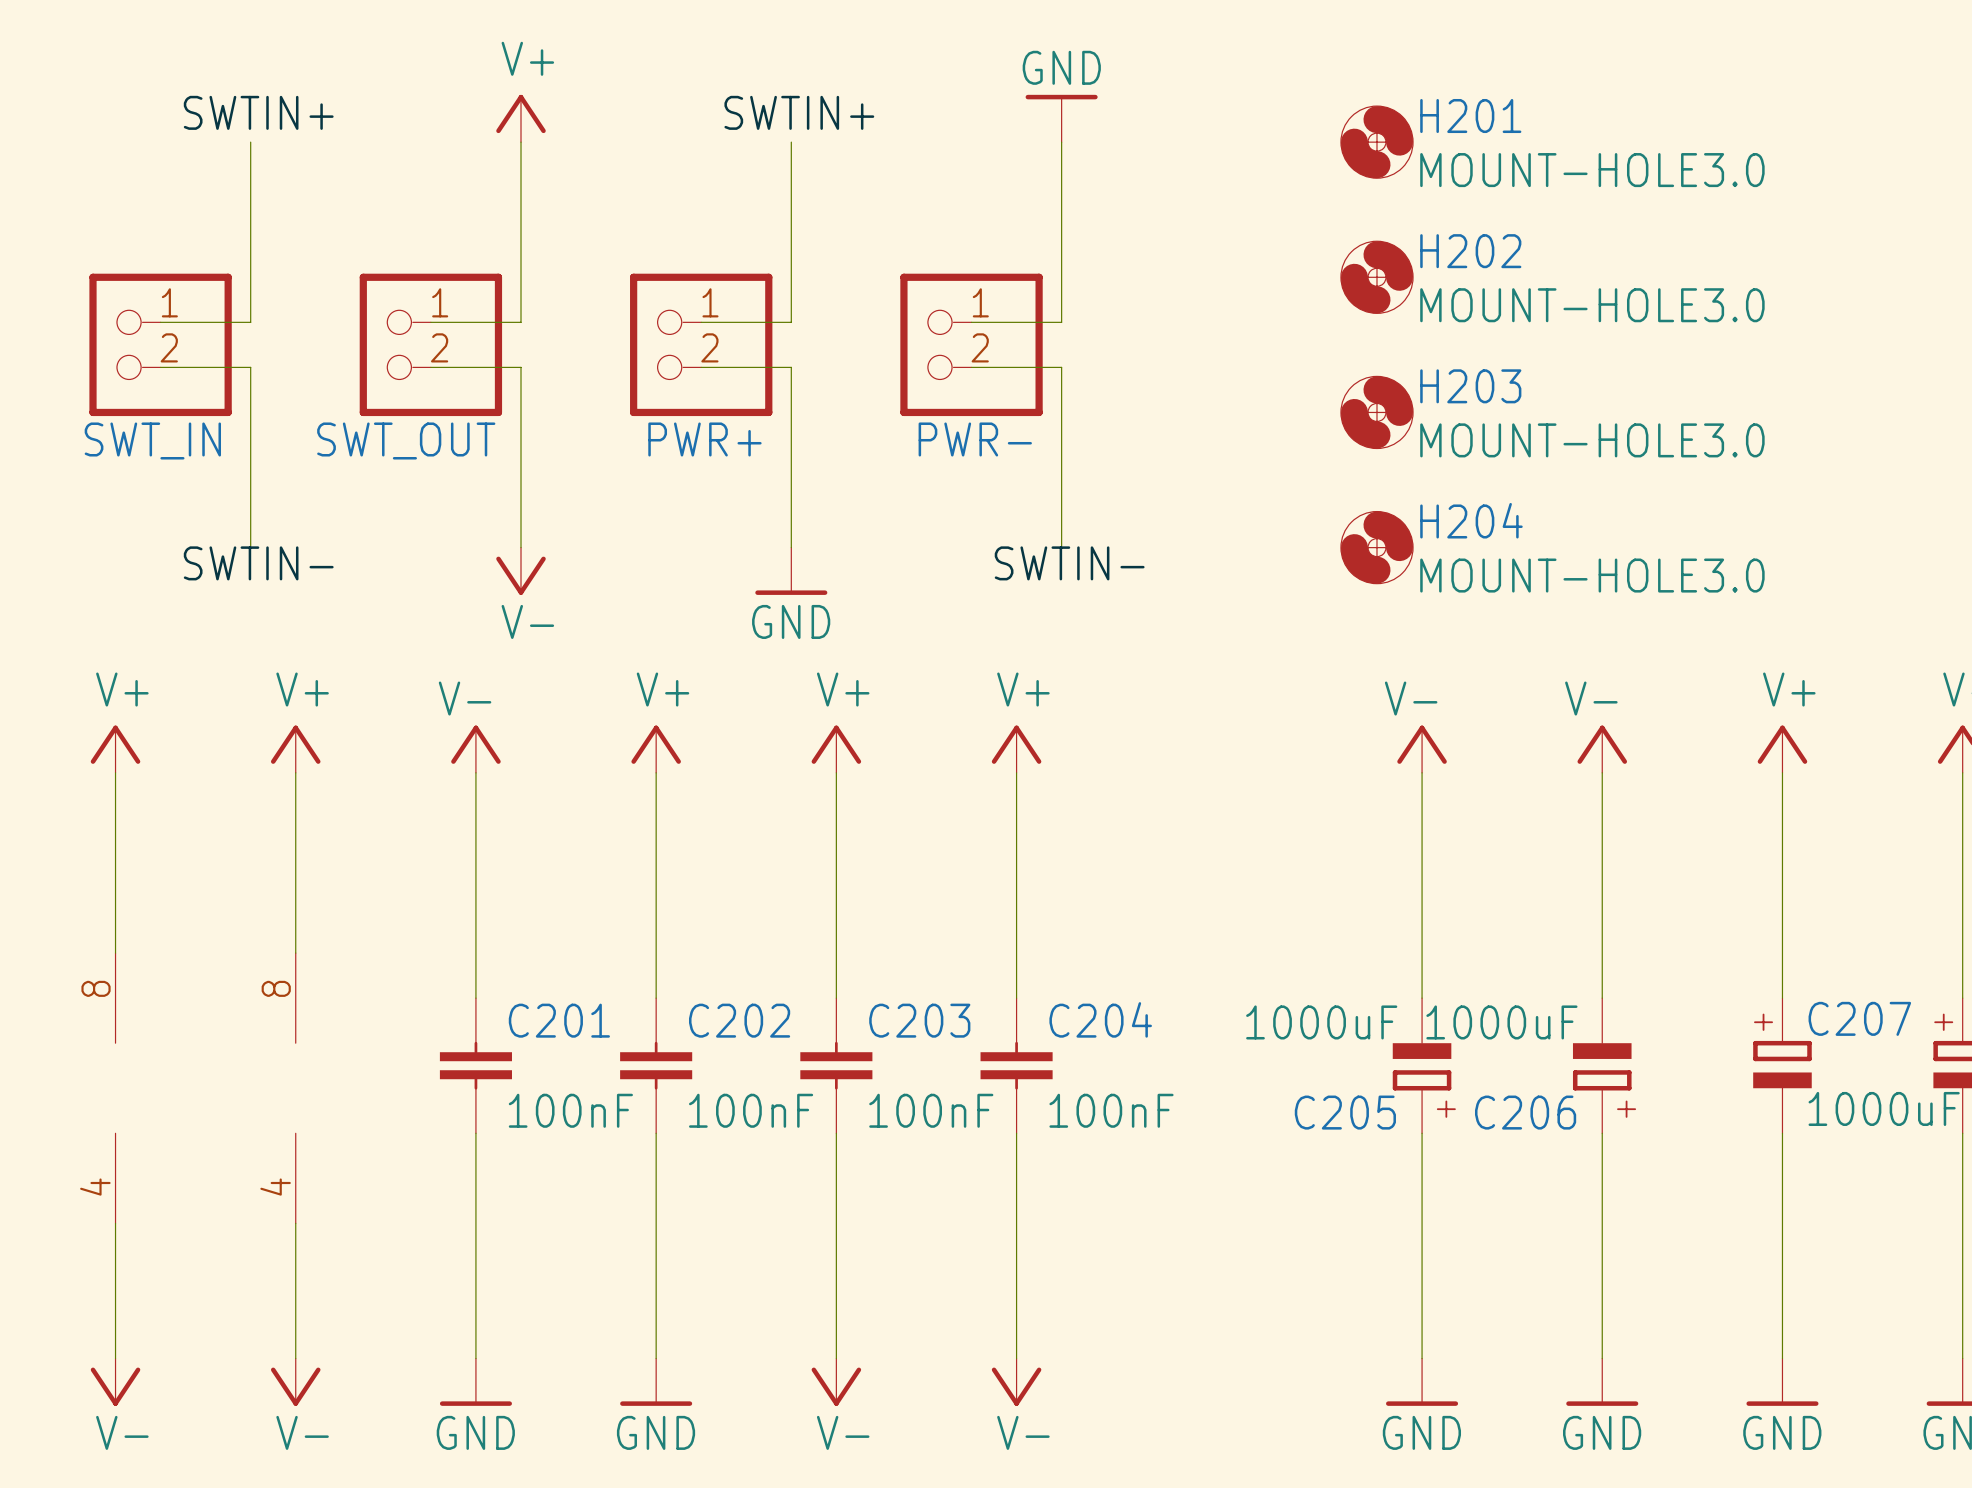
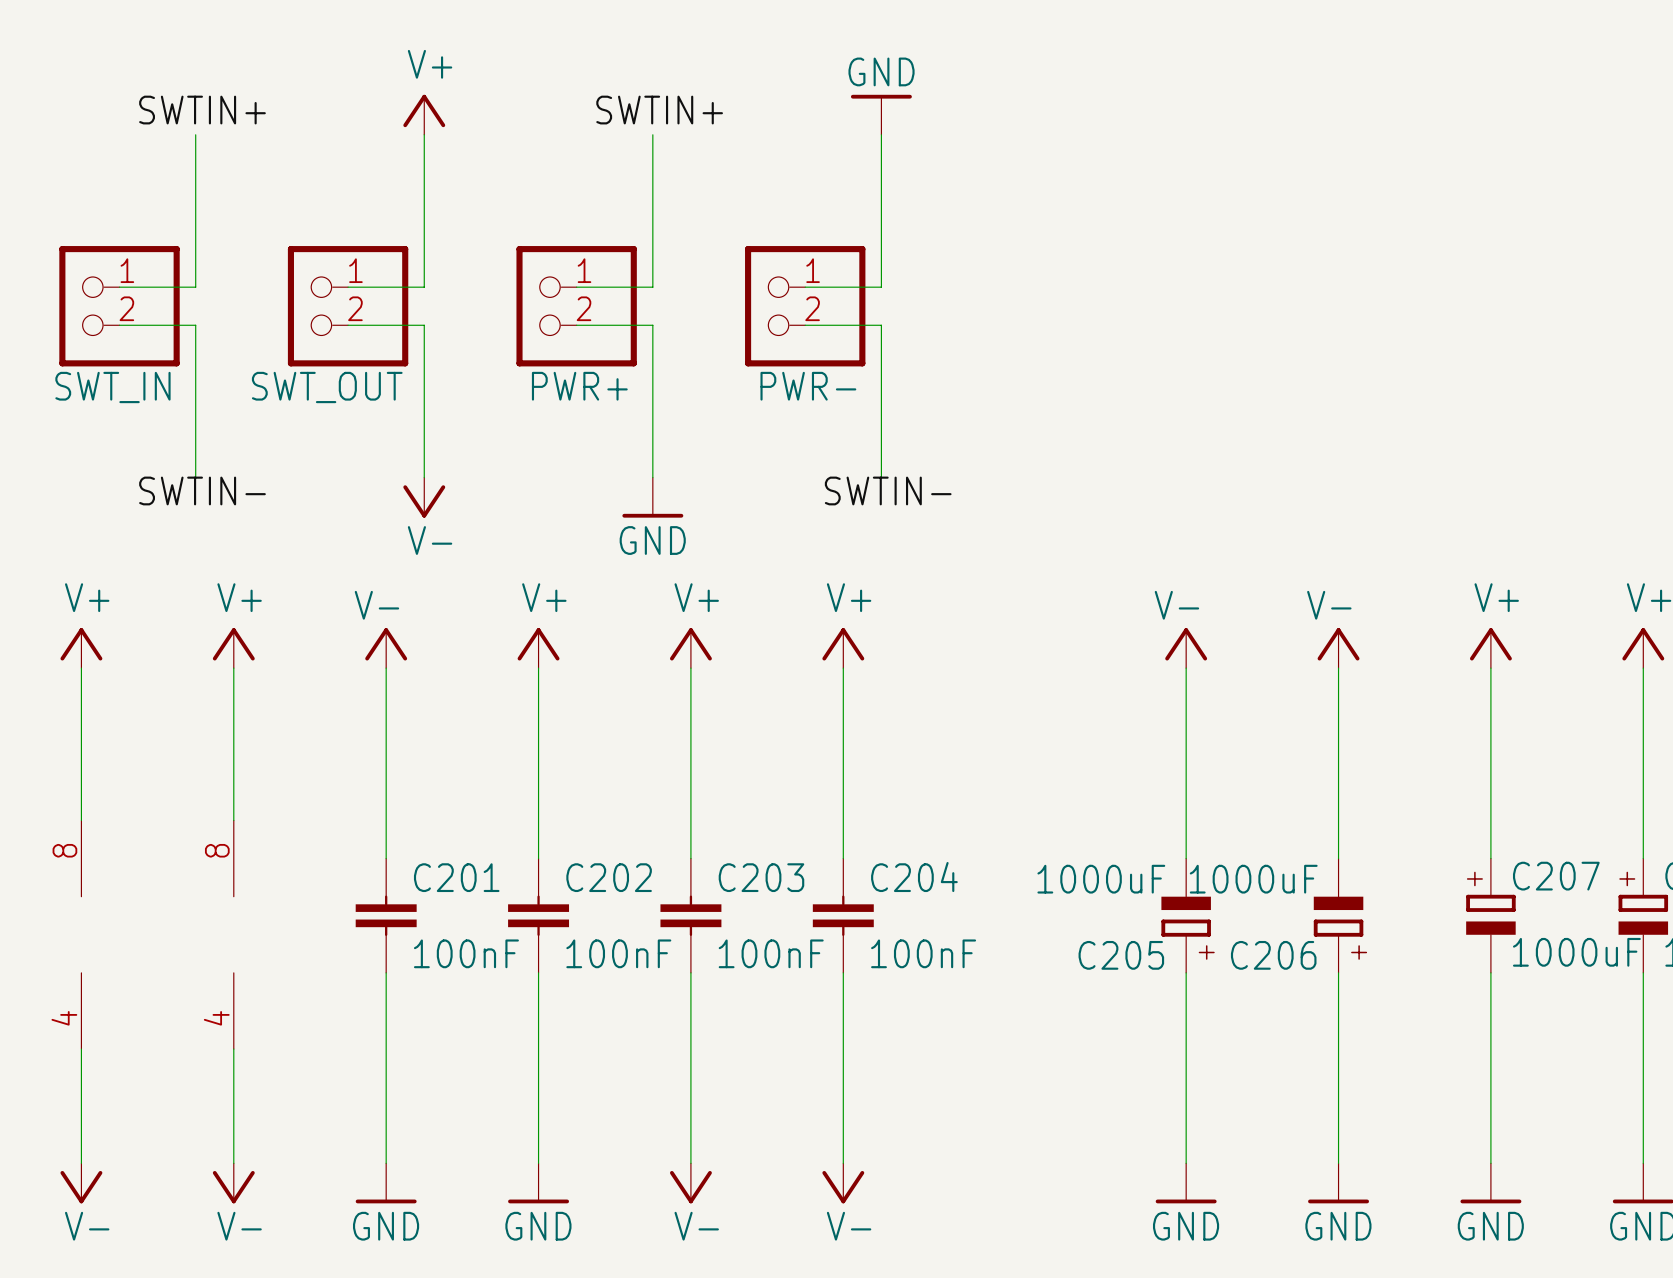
H201: MOUNT-HOLE3.0 (1376, 142) -> none
H202: MOUNT-HOLE3.0 (1376, 277) -> none
H203: MOUNT-HOLE3.0 (1376, 412) -> none
H204: MOUNT-HOLE3.0 (1376, 547) -> none

